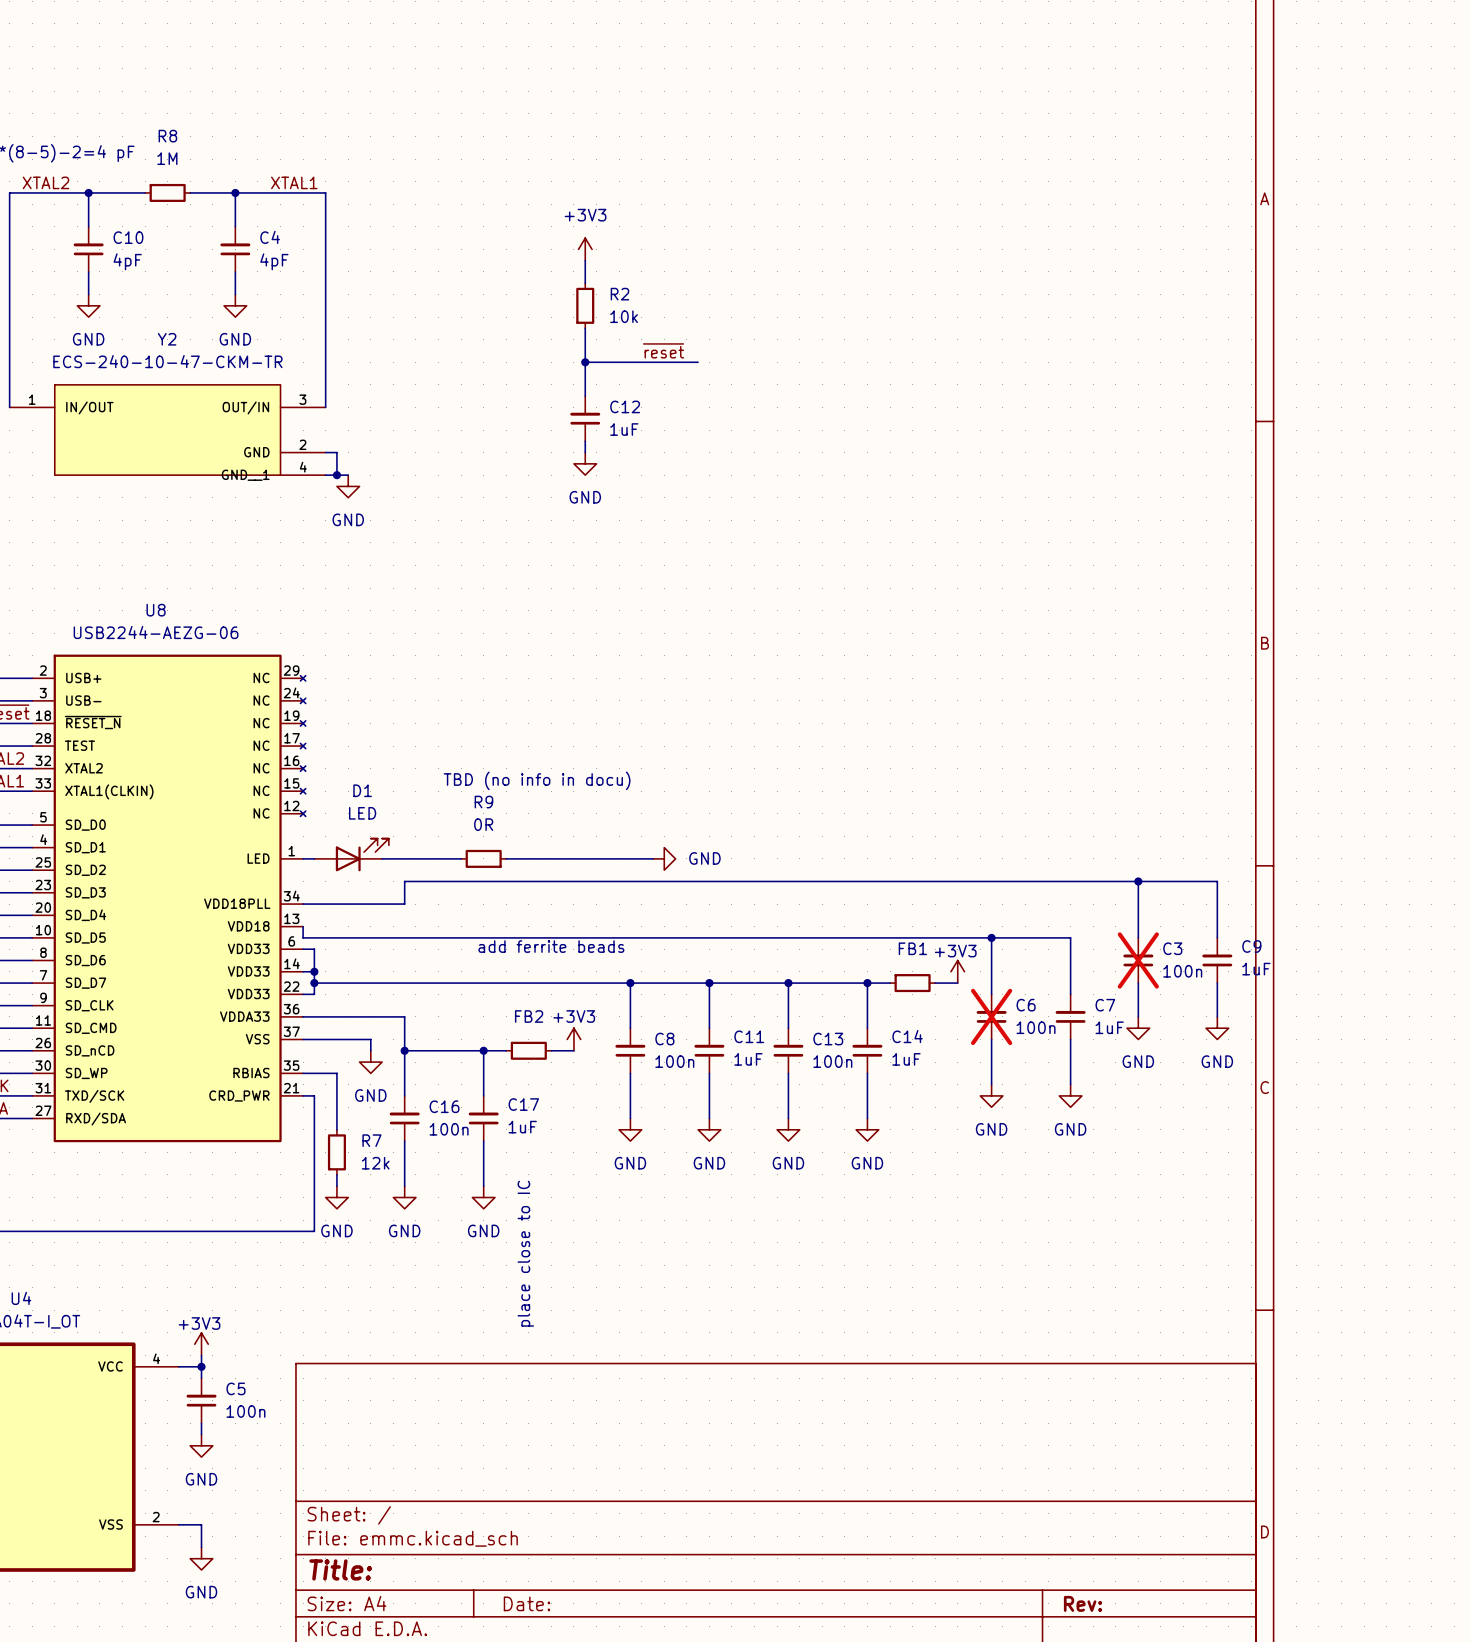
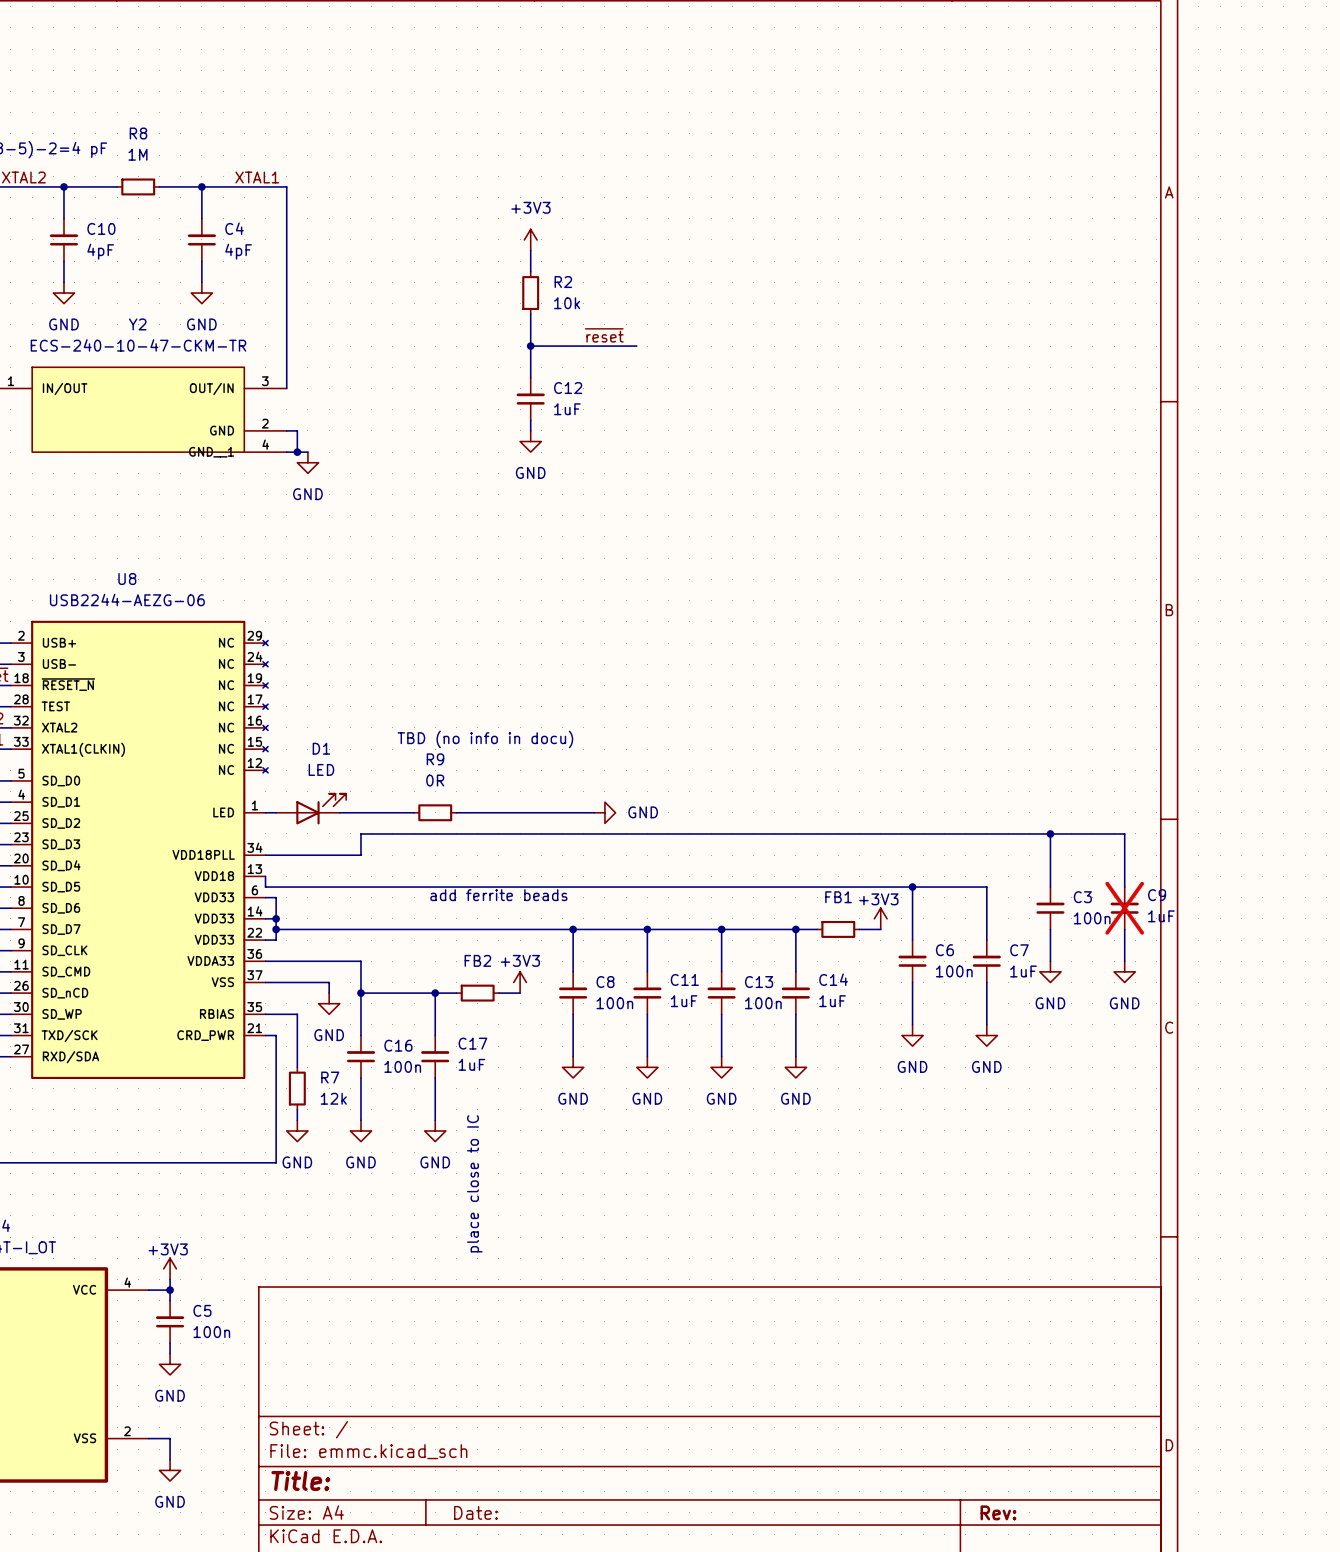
C3 do-not-place cross: (1138, 960) -> none
C9 do-not-place cross: none -> (1124, 908)
C6 do-not-place cross: (991, 1016) -> none

